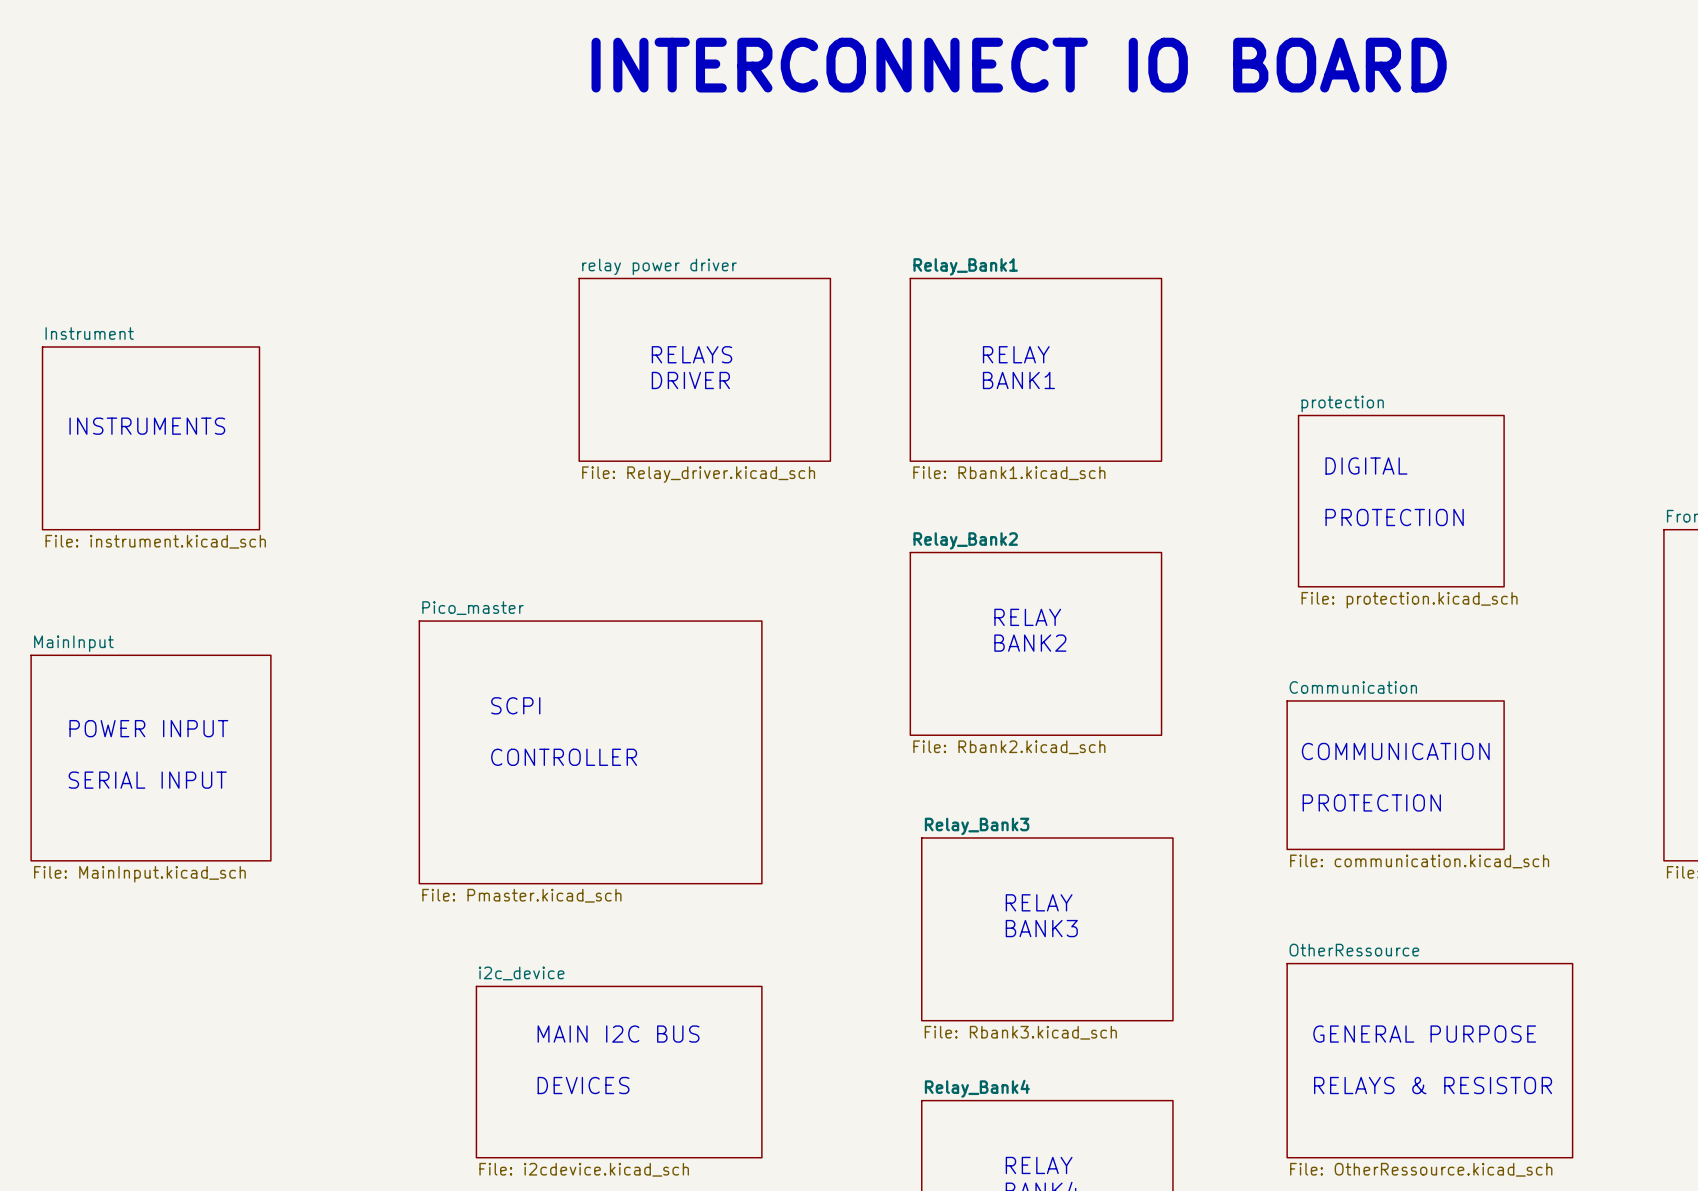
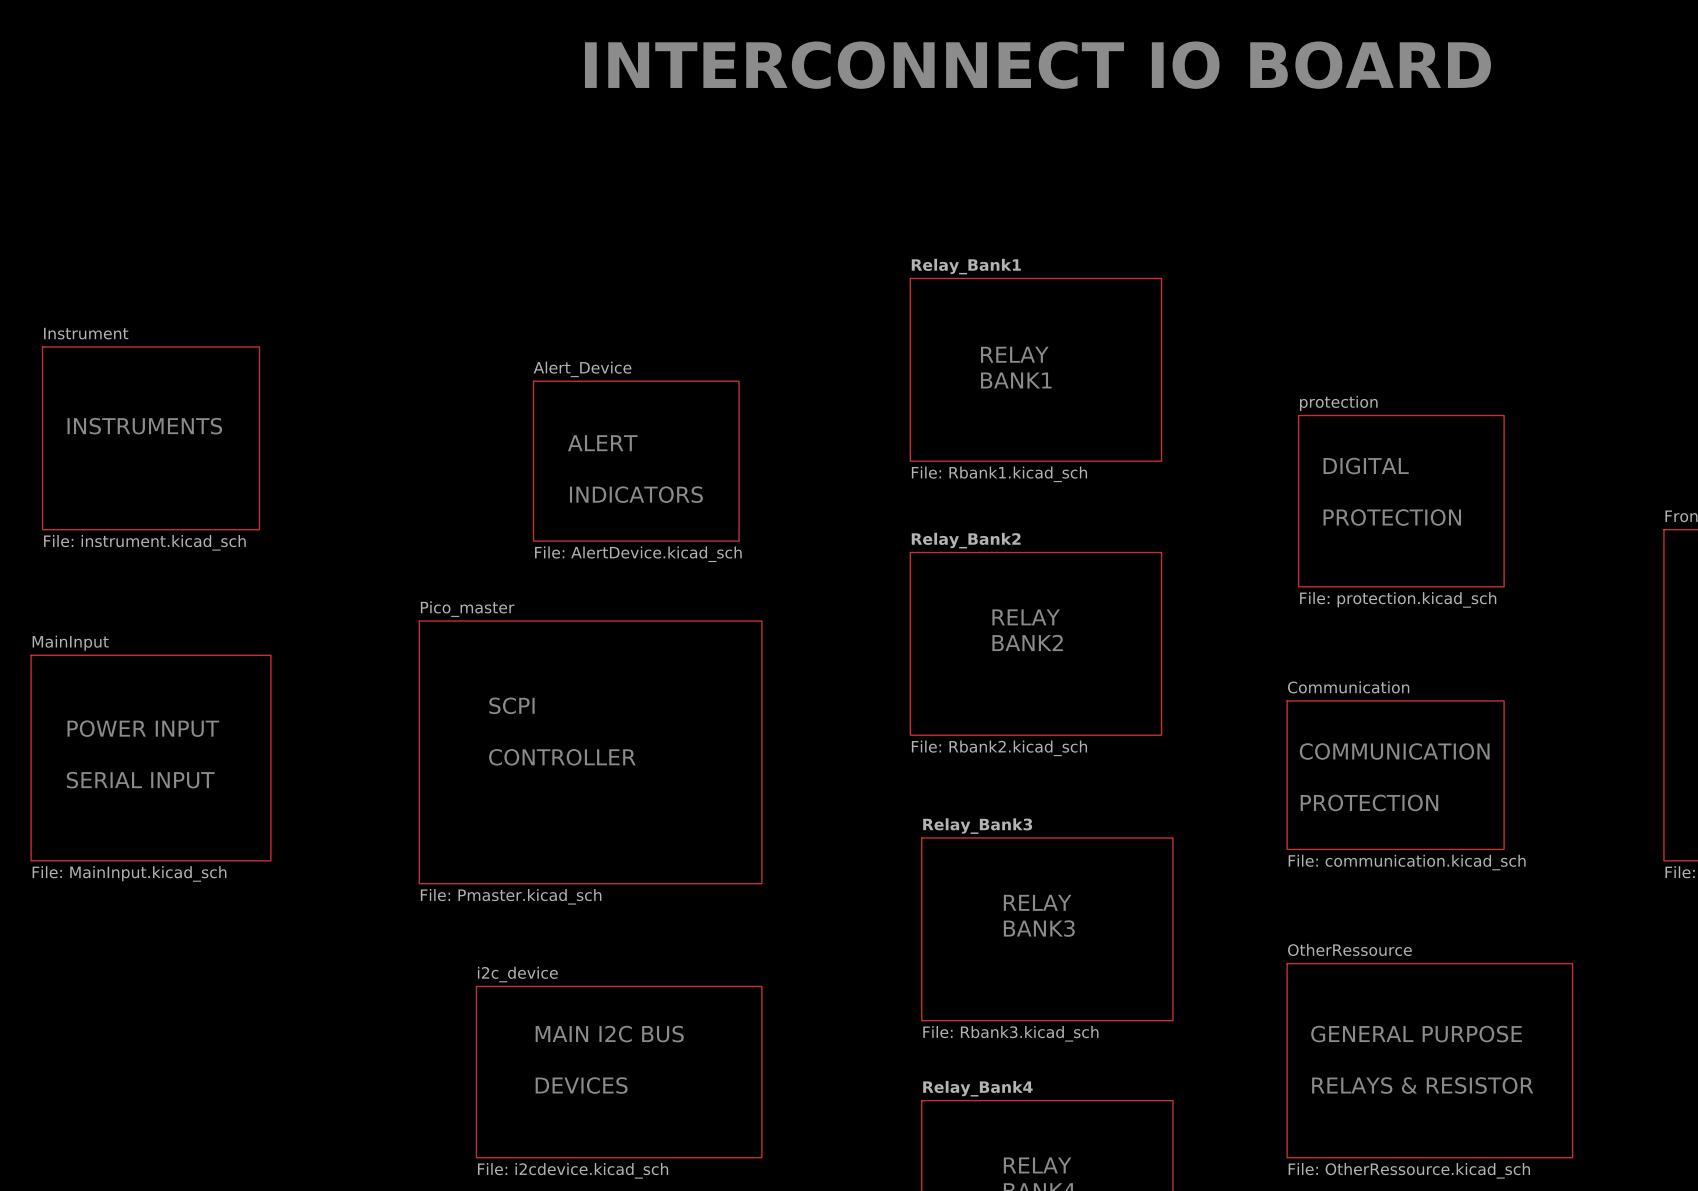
text: RELAYS (692, 354) -> none
sheet relay power driver: File: Relay_driver.kicad_sch (704, 369) -> none
text: DRIVER (690, 380) -> none
text: none -> ALERT (602, 443)
sheet Alert_Device: none -> File: AlertDevice.kicad_sch (636, 461)
text: none -> INDICATORS (636, 494)

